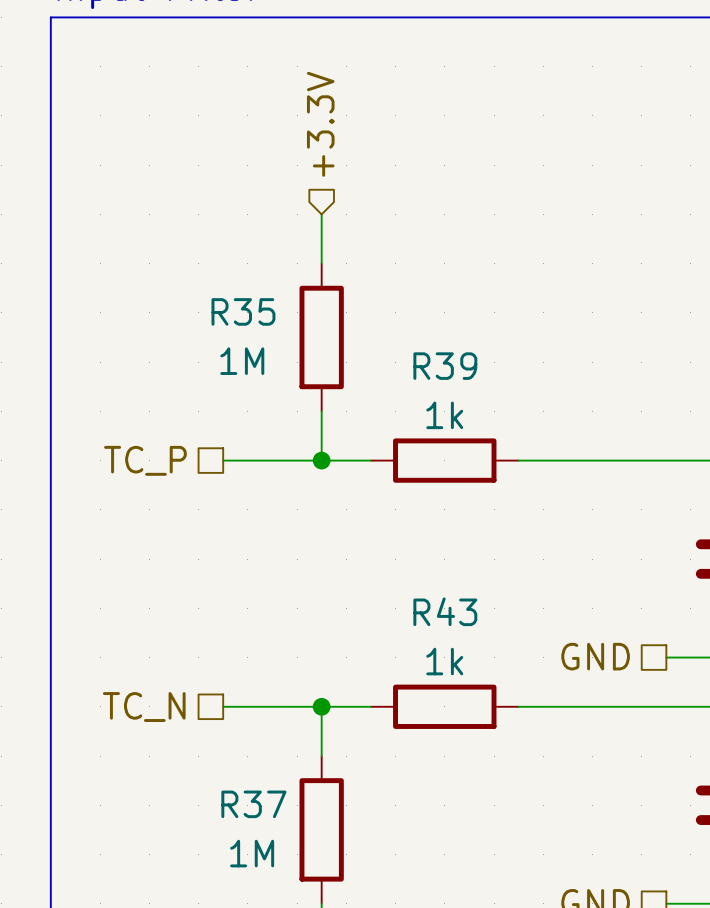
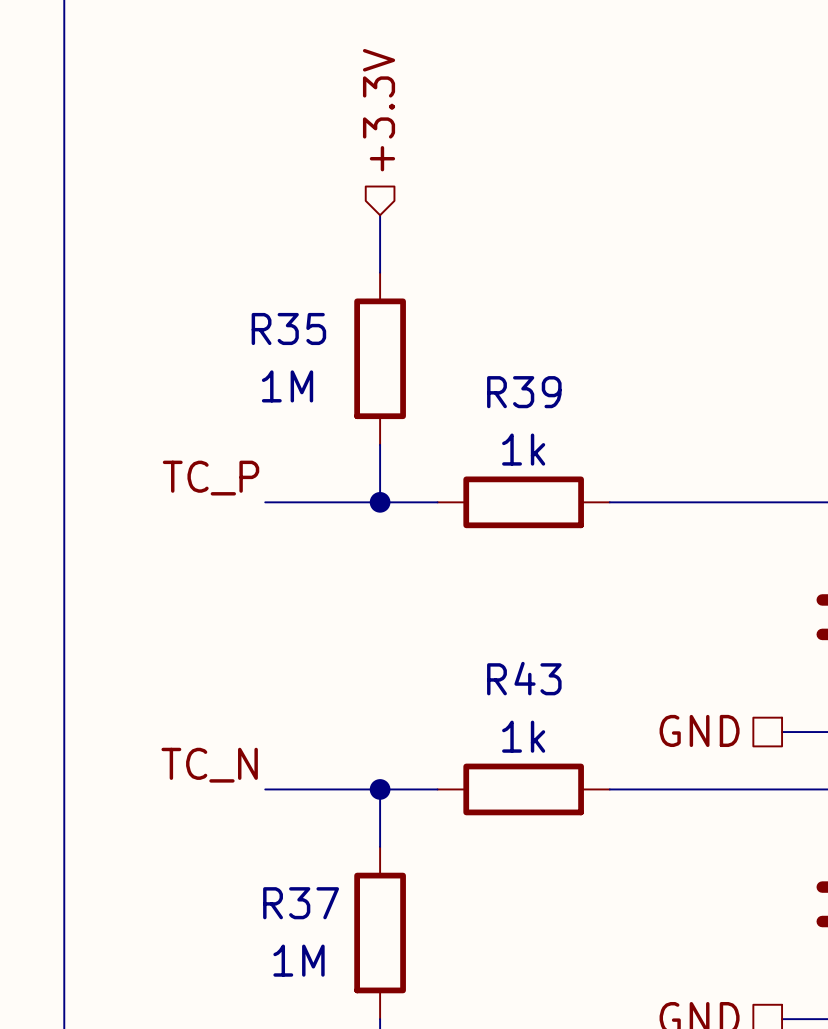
label: none -> TC_P (211, 478)
hierarchical label: TC_P (145, 460) -> none
label: none -> TC_N (209, 765)
hierarchical label: TC_N (144, 707) -> none

